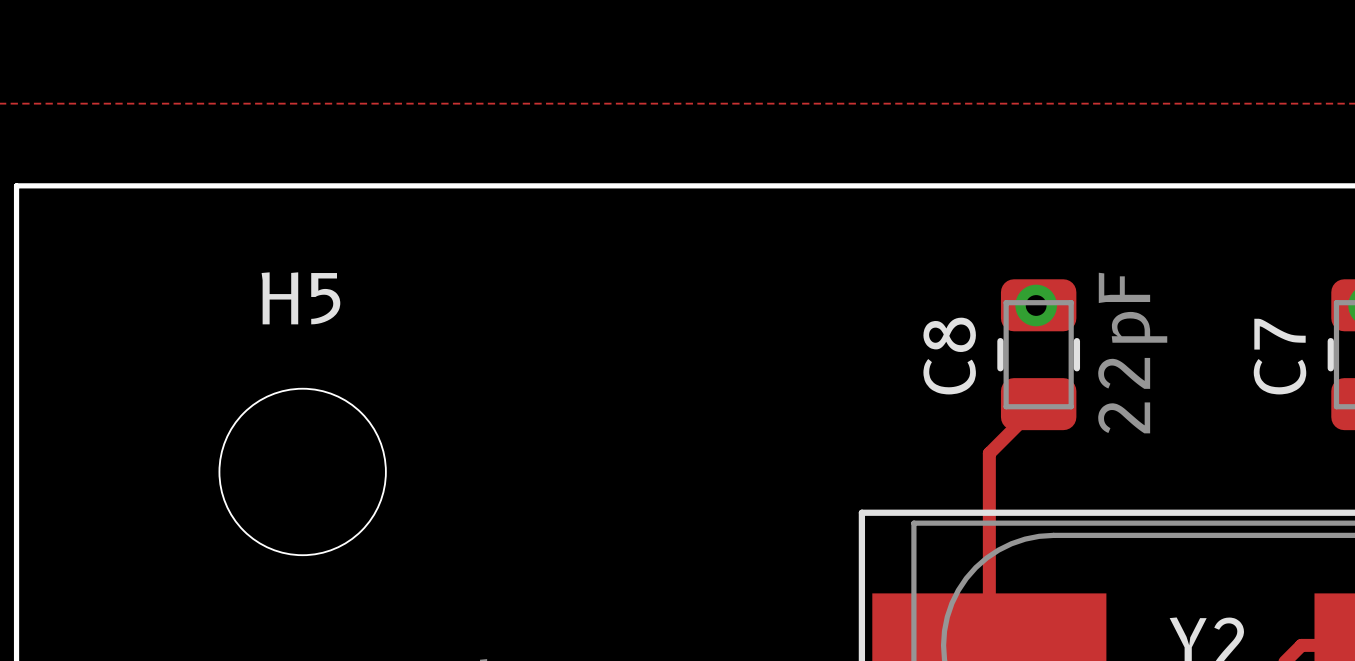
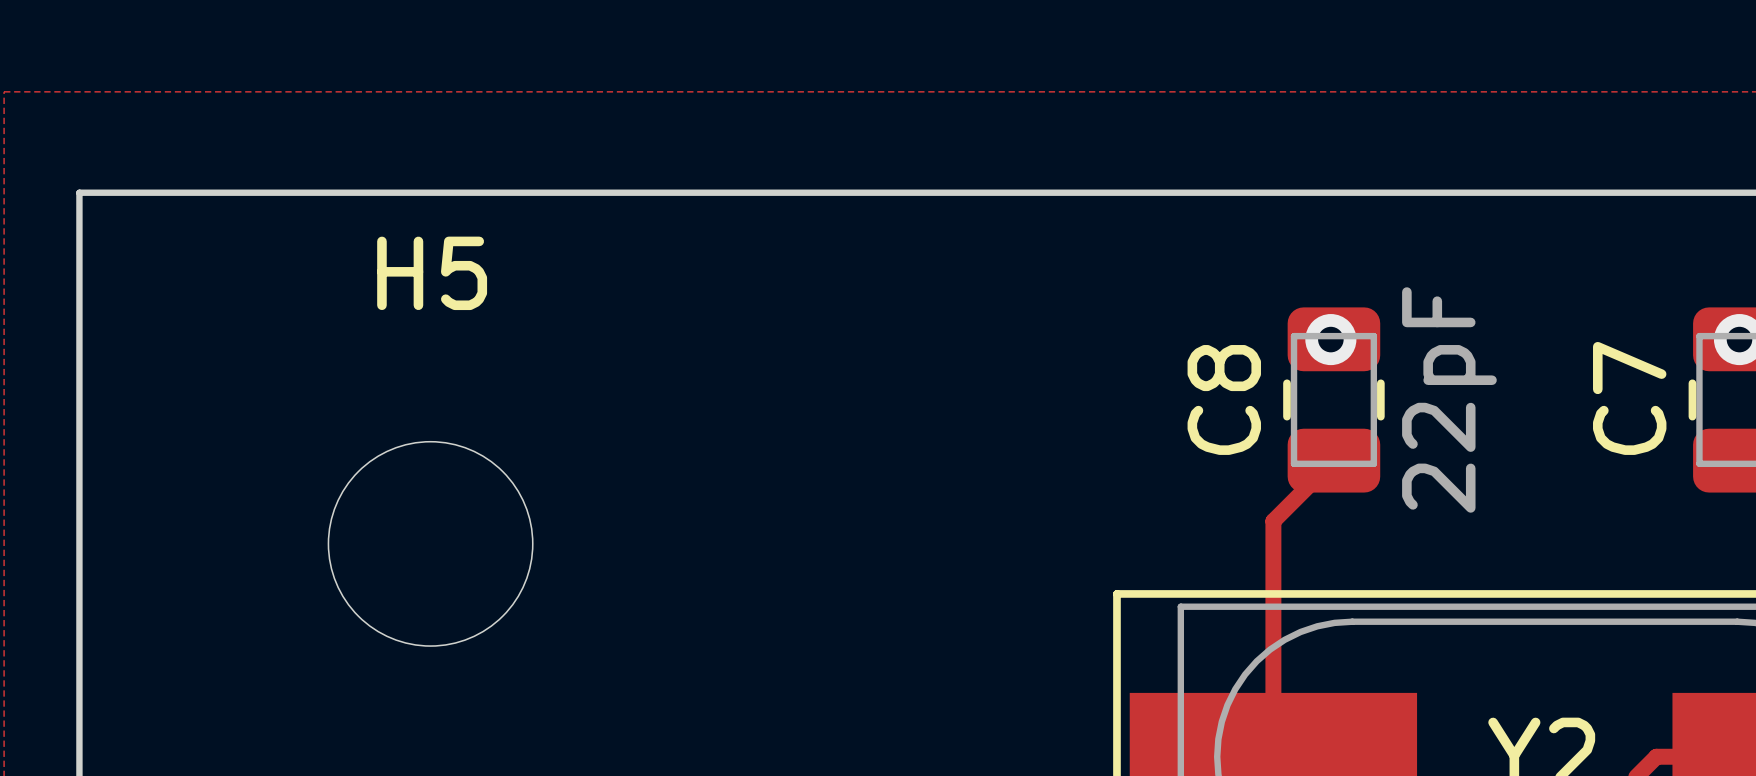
H5 name position: H5 (300, 298) -> H5 (432, 273)

